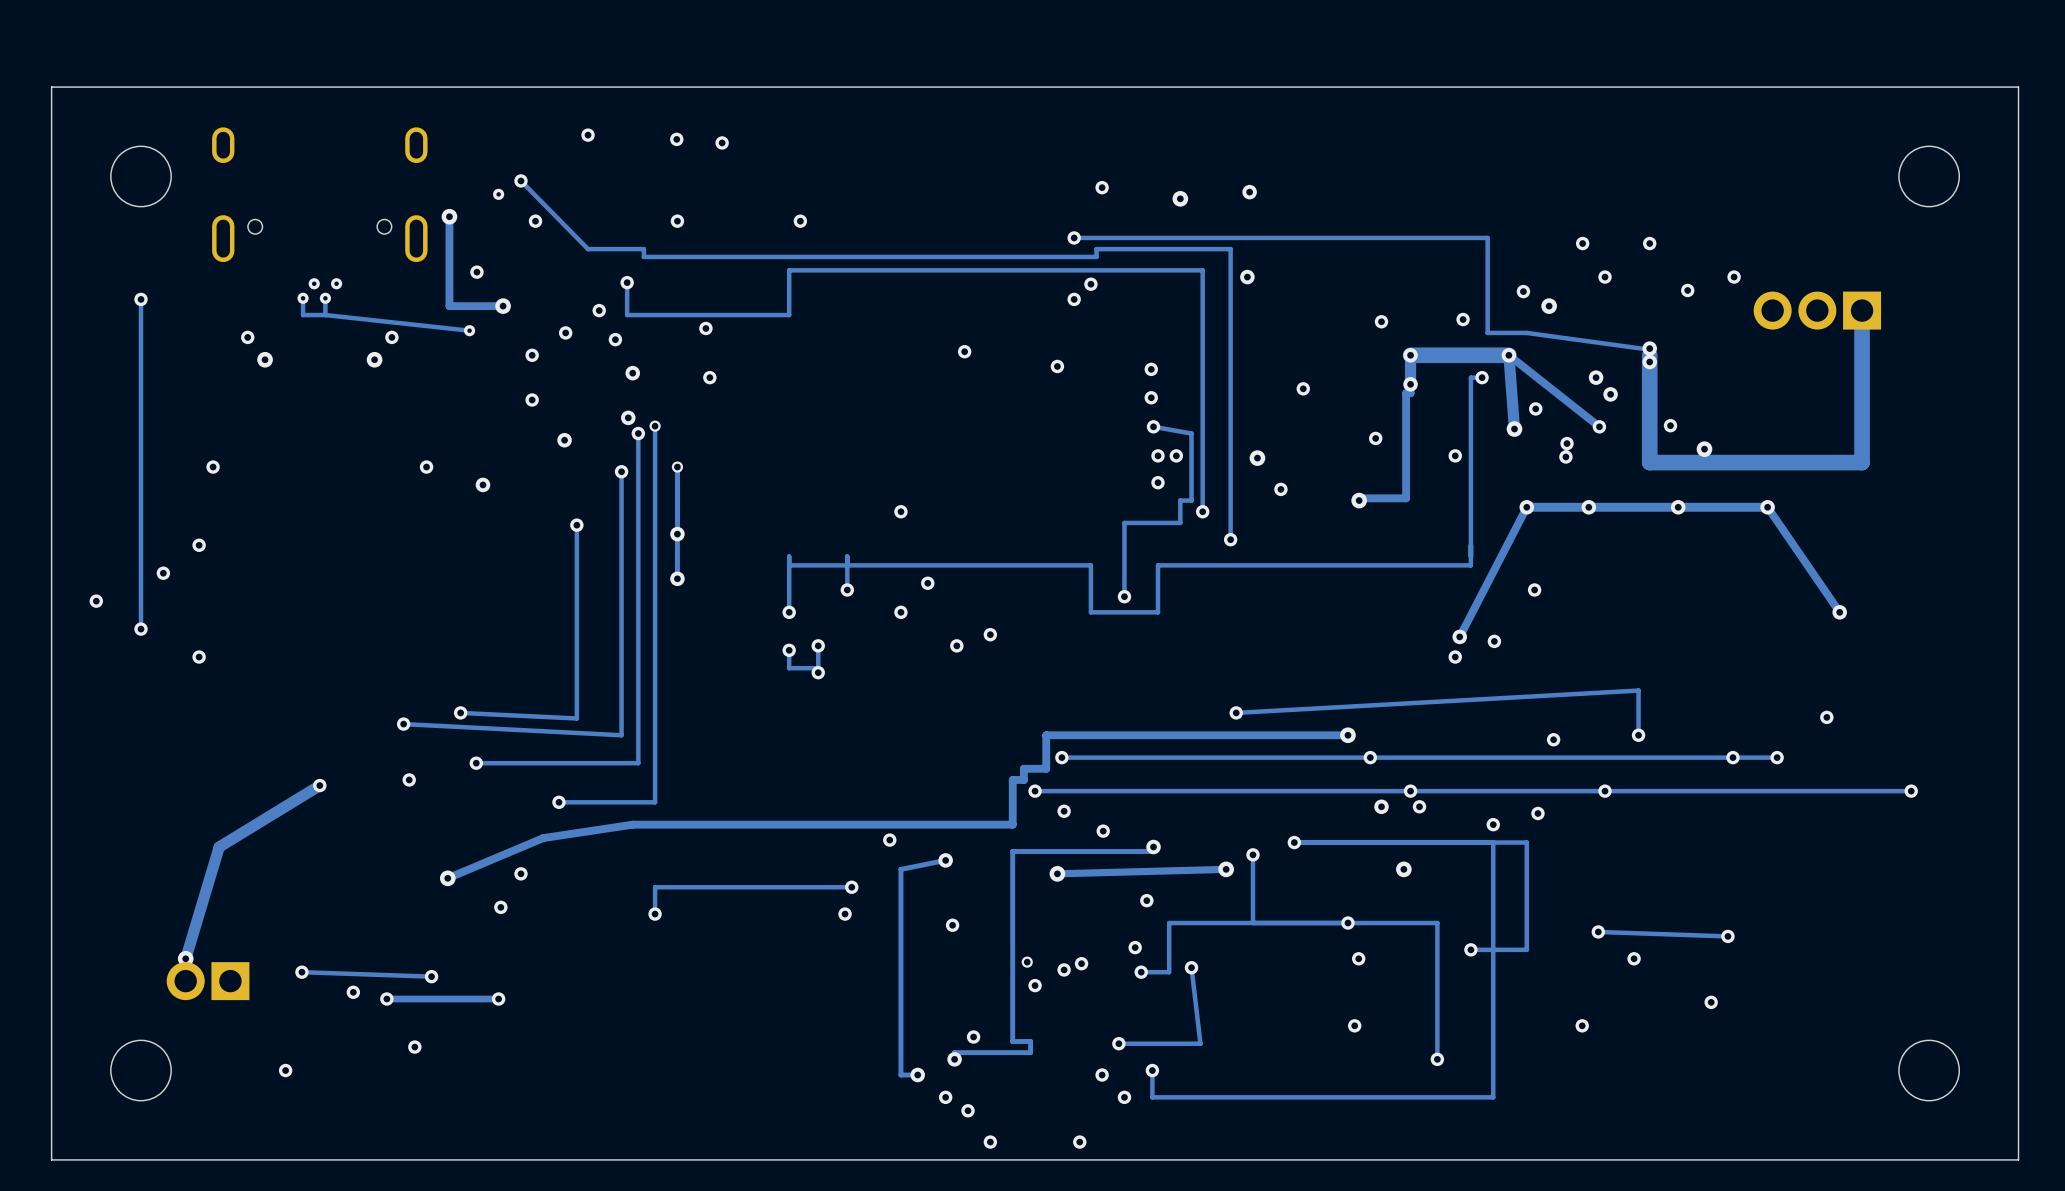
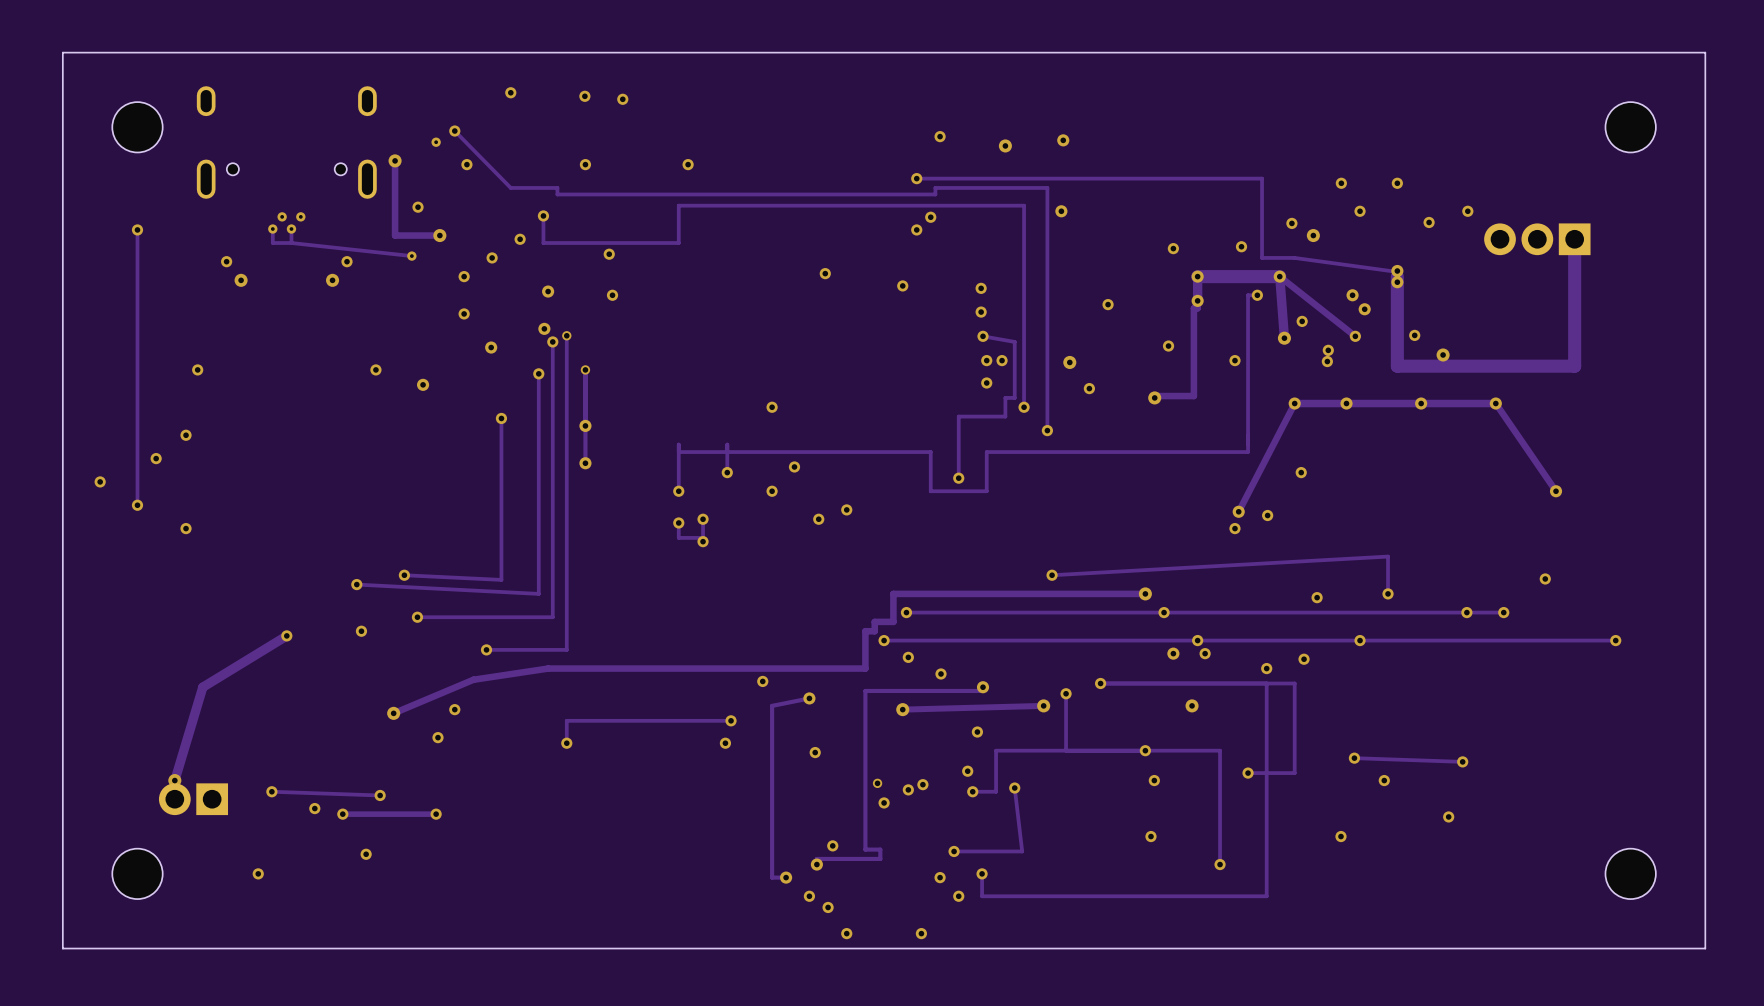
via: (615, 339) -> none

